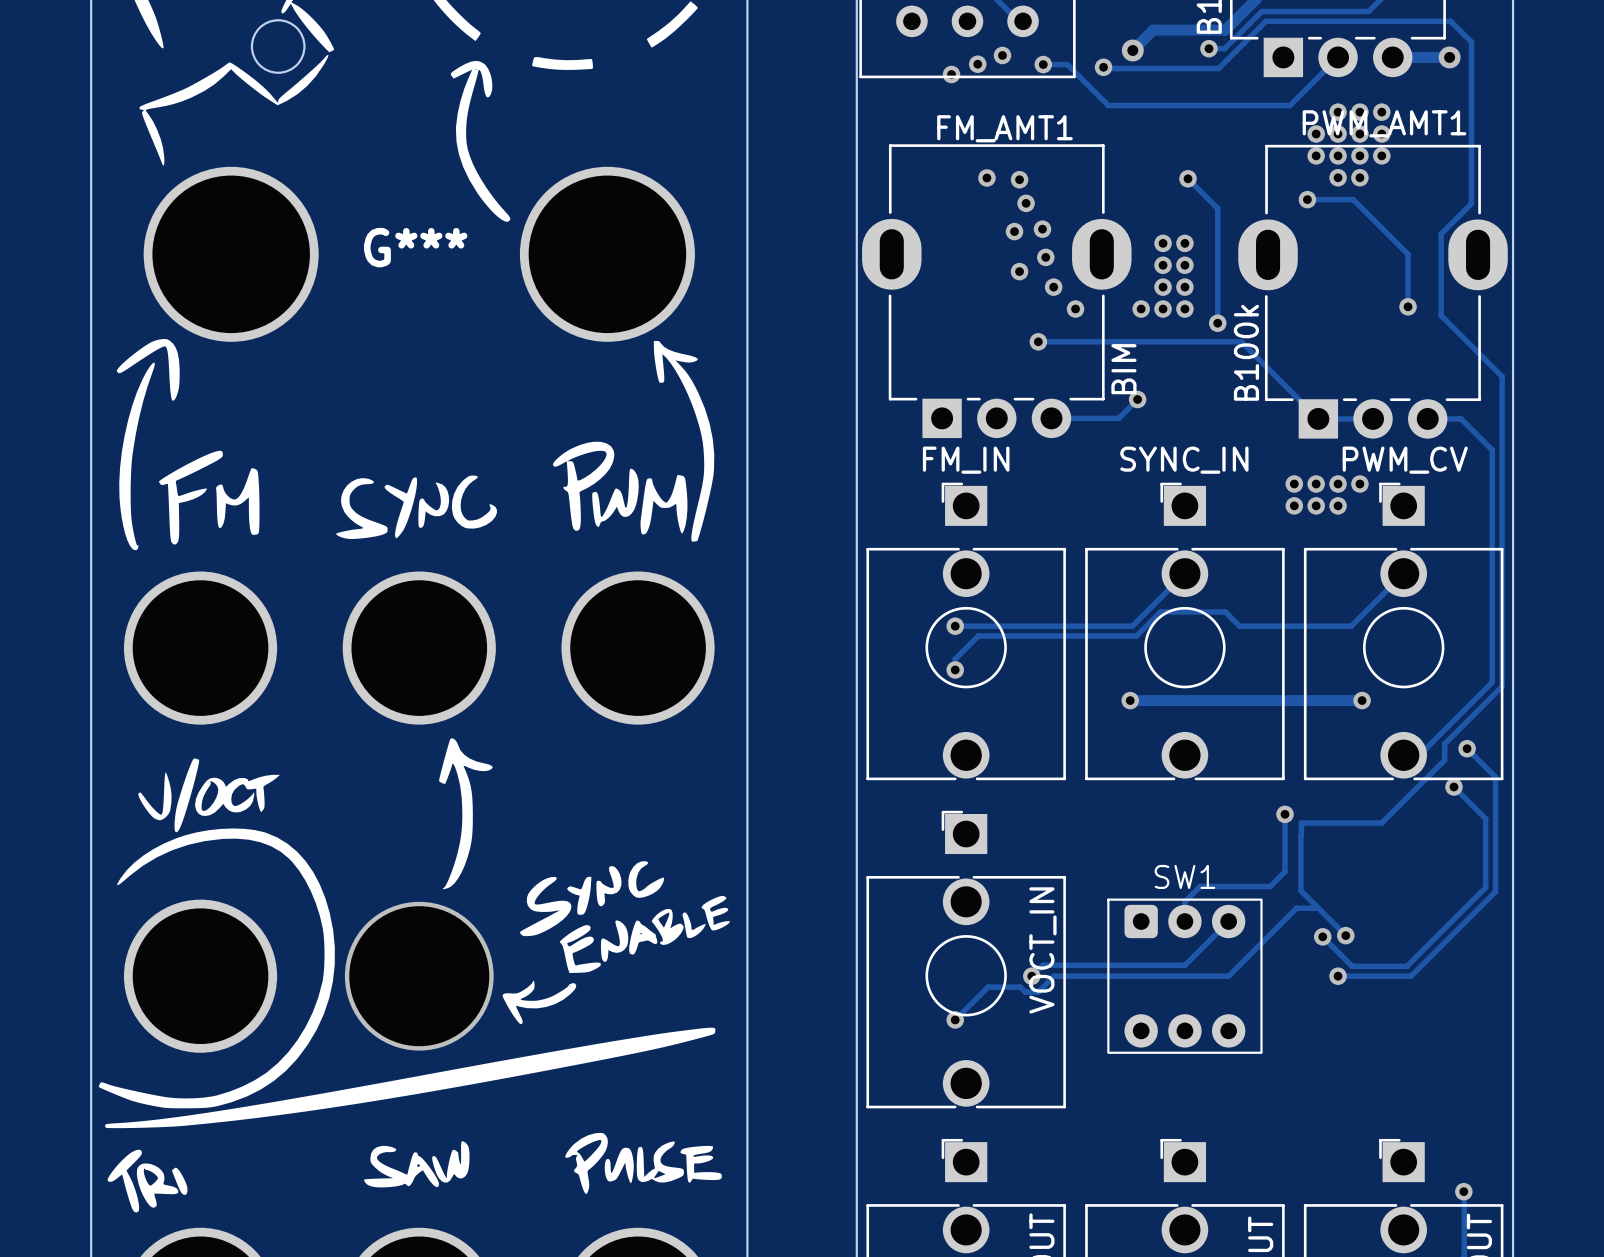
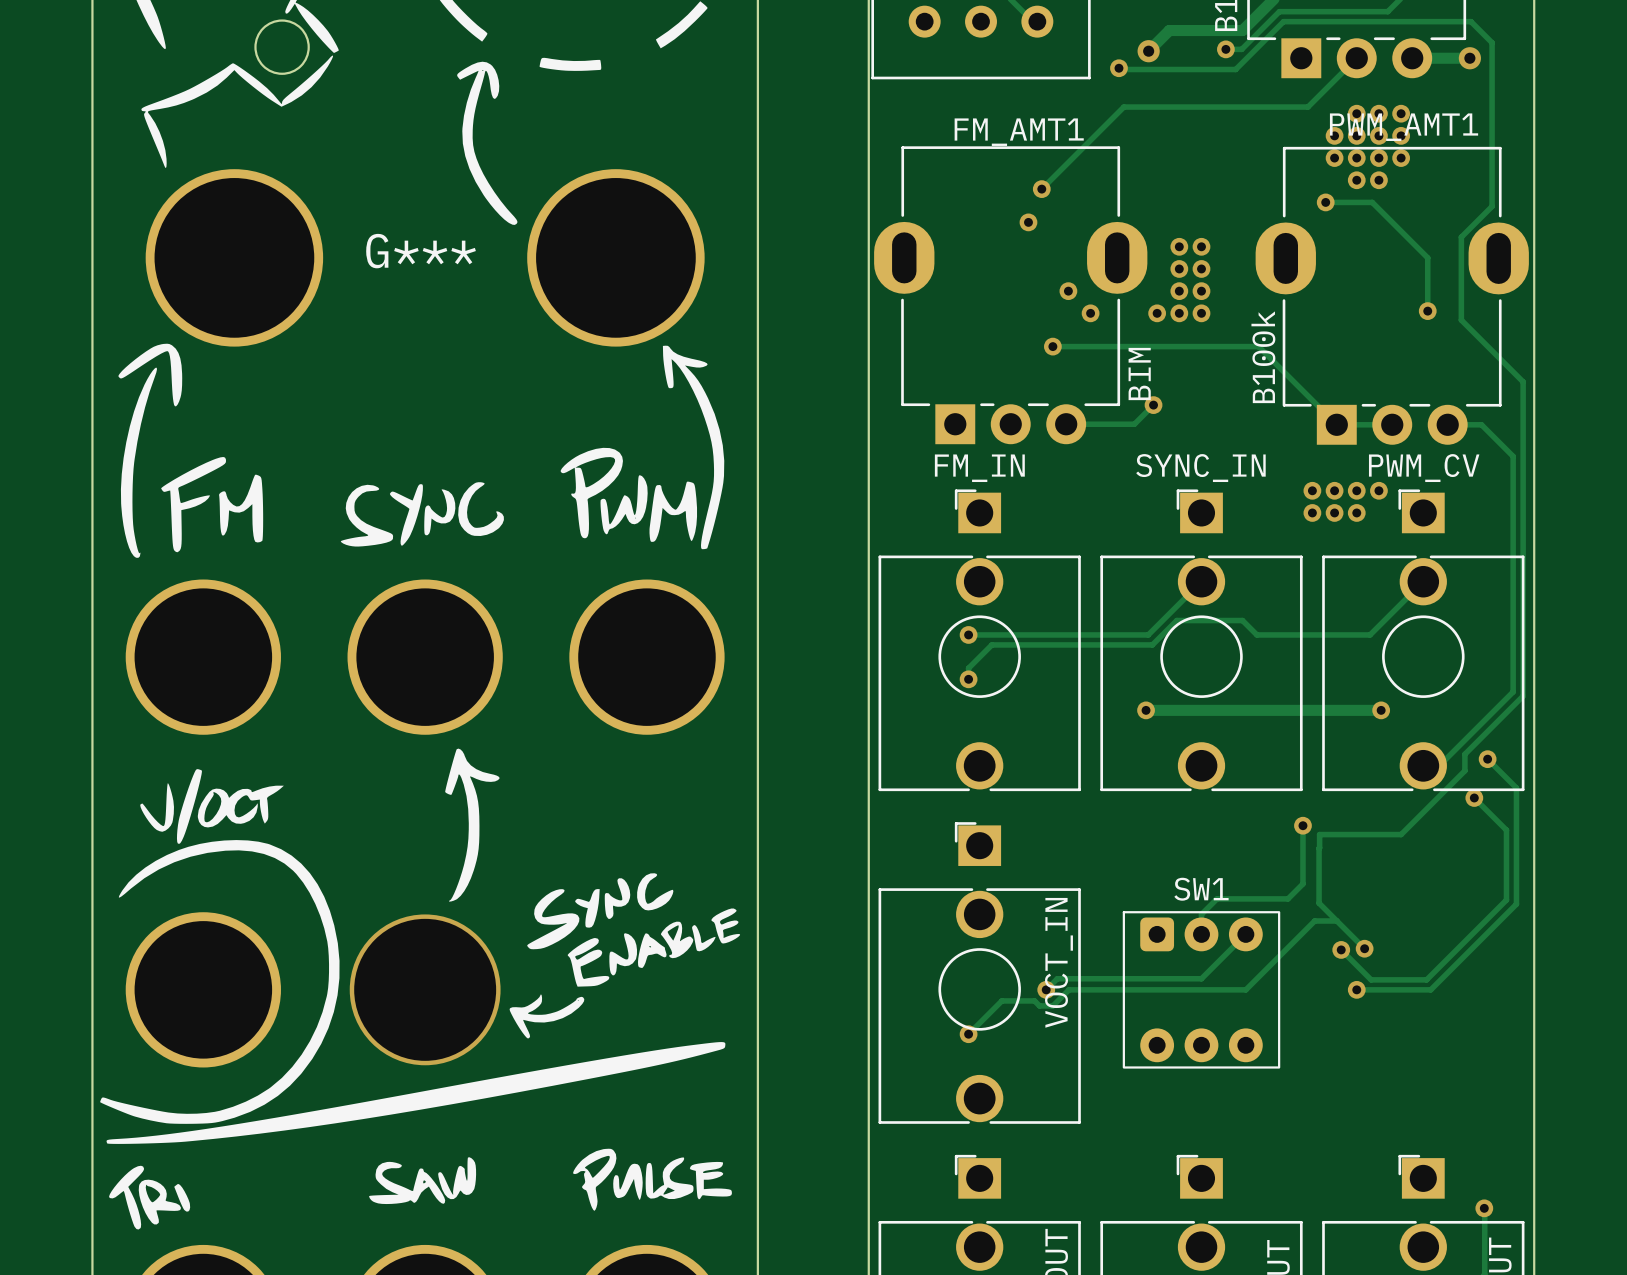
via: (1002, 55) -> none
via: (977, 64) -> none
track: (1043, 64) (1067, 64) (1108, 105) -> (1041, 189) (1123, 107)
via: (1043, 64) -> none
via: (951, 74) -> none
via: (986, 177) -> none
track: (1188, 178) (1217, 208) (1217, 323) -> none
via: (1188, 178) -> none
via: (1019, 179) -> none
via: none -> (1041, 189)
via: (1026, 203) -> none
via: none -> (1028, 222)
via: (1042, 229) -> none
via: (1014, 231) -> none
via: (1045, 257) -> none
via: (1019, 271) -> none
via: (1217, 323) -> none

